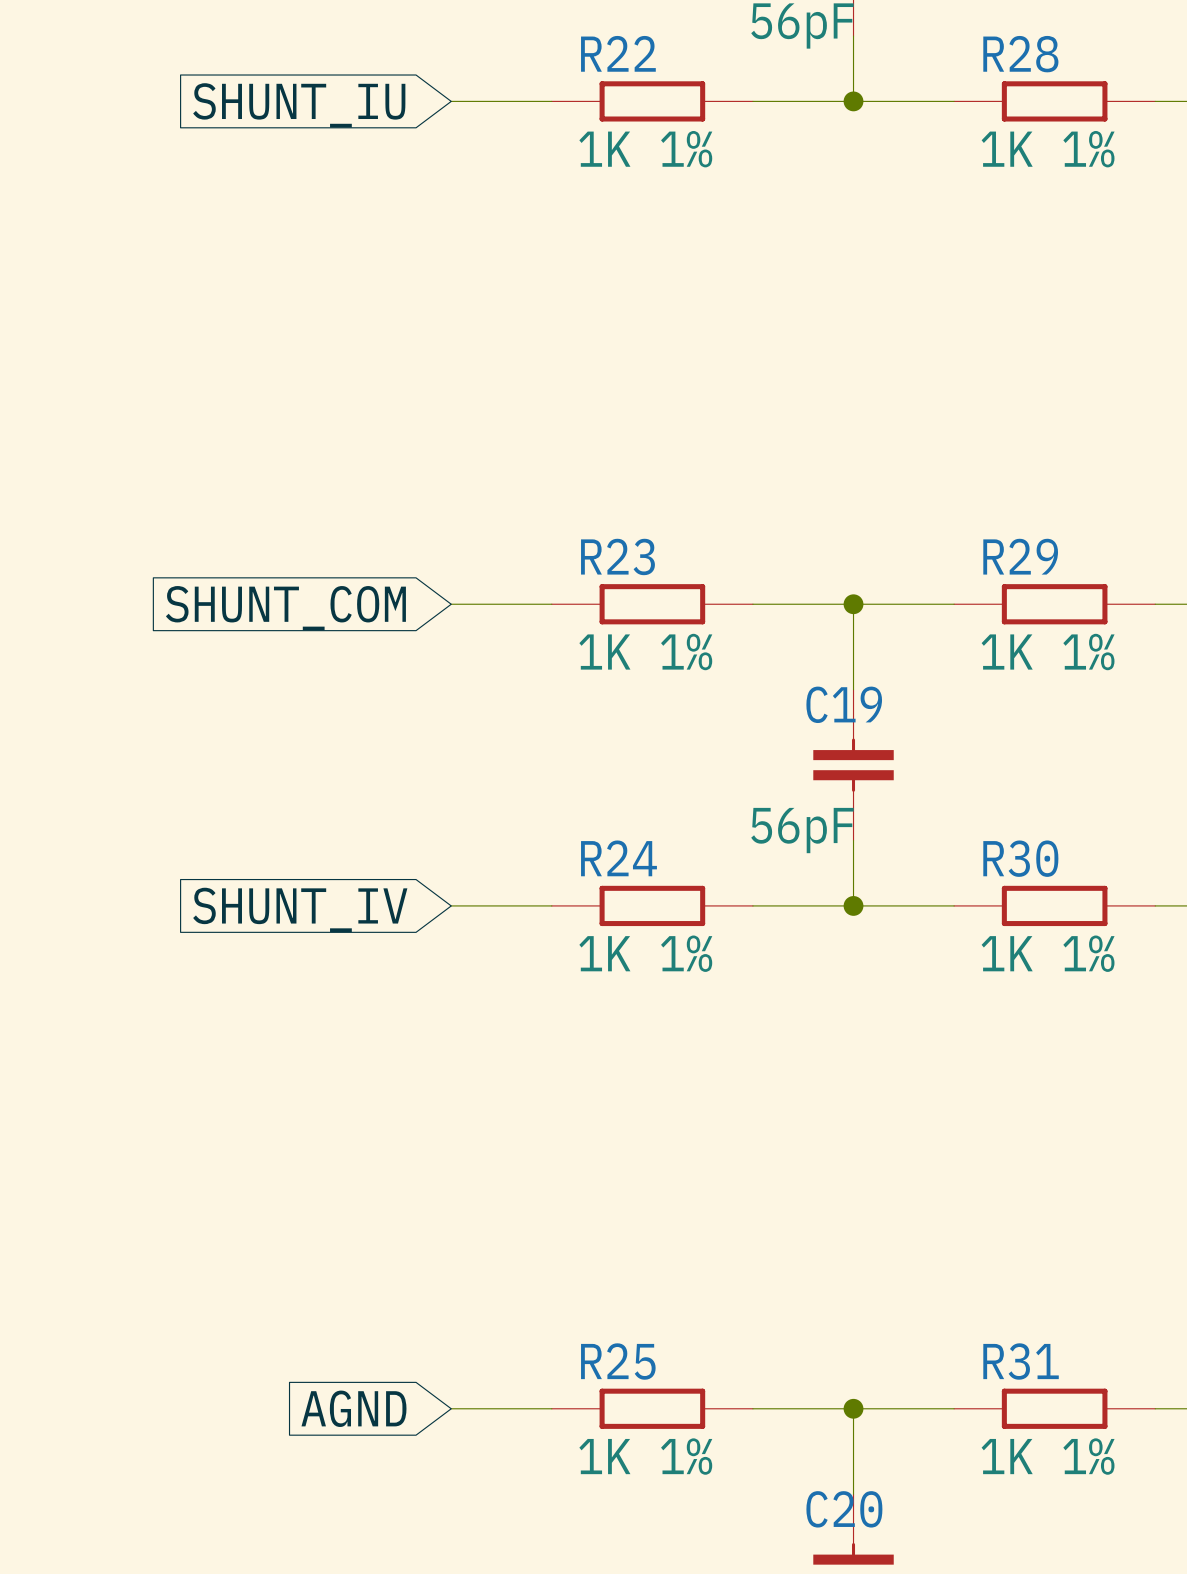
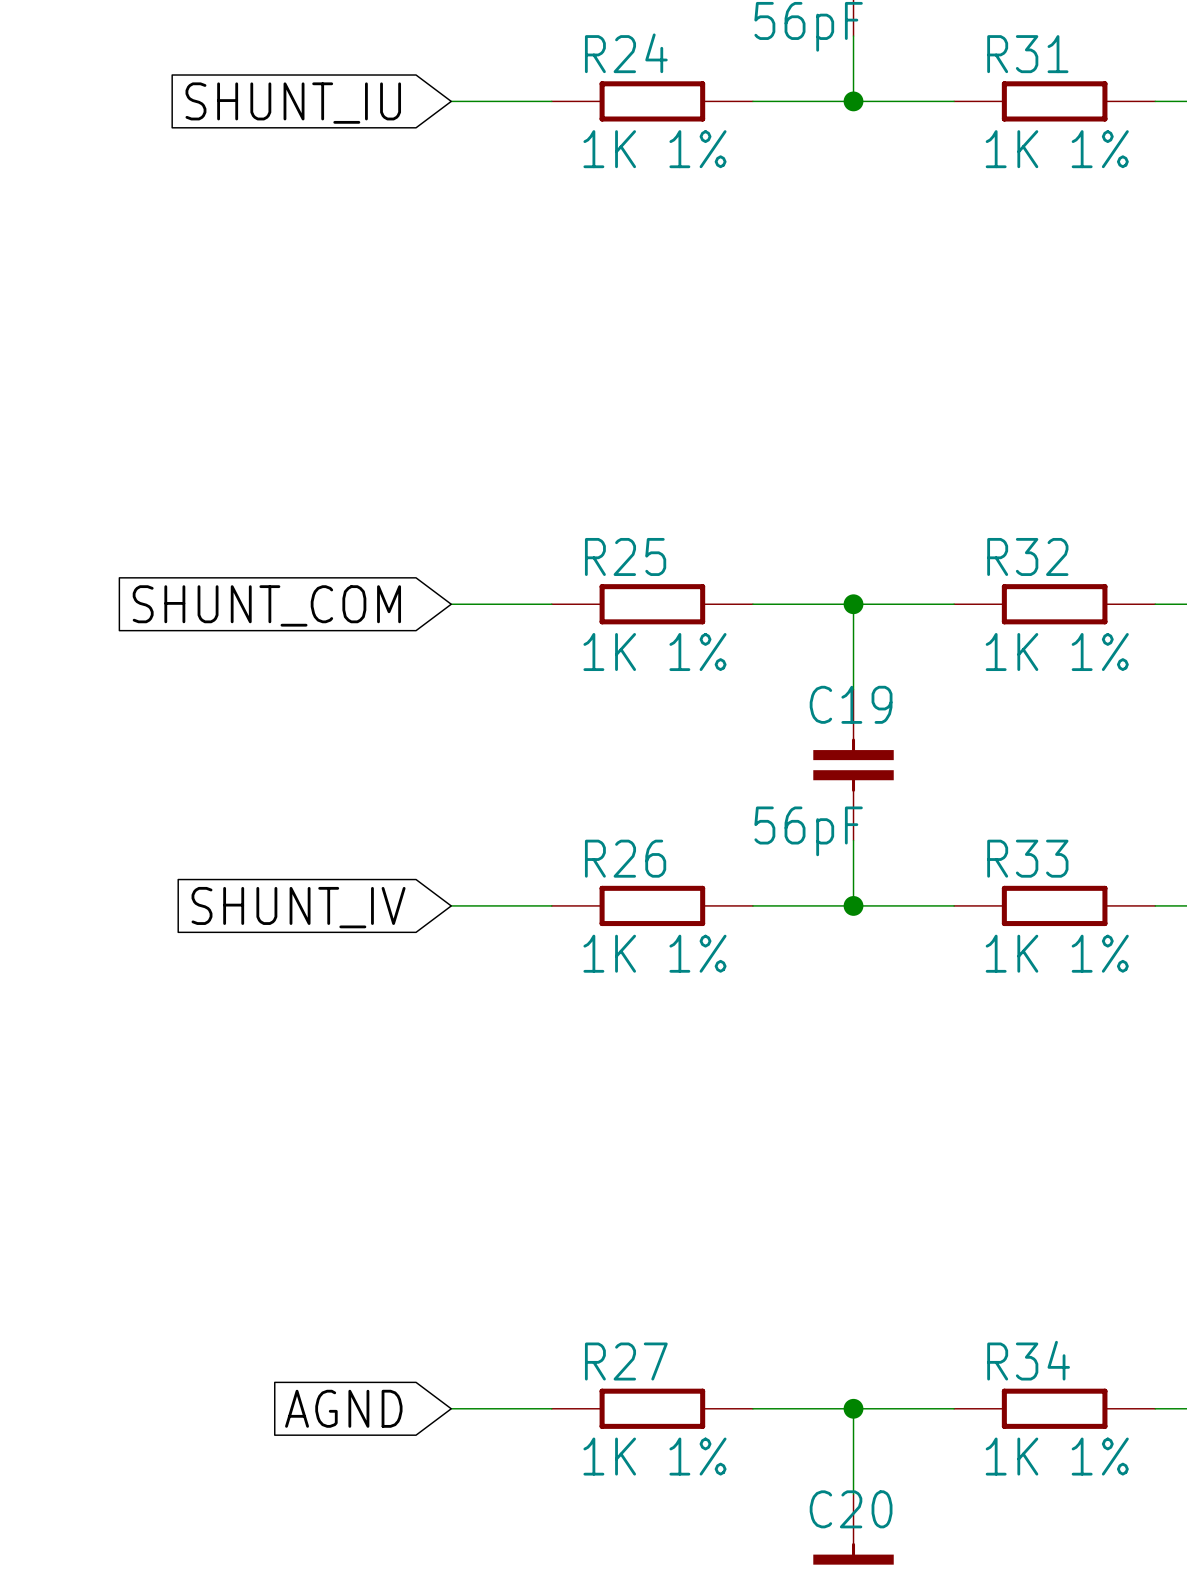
R22 name: R22 (618, 53) -> R24 (626, 53)
R28 name: R28 (1020, 54) -> R31 (1027, 54)
R23 name: R23 (617, 556) -> R25 (625, 556)
R29 name: R29 (1020, 556) -> R32 (1027, 556)
R24 name: R24 (618, 858) -> R26 (625, 858)
R30 name: R30 (1020, 858) -> R33 (1027, 858)
R25 name: R25 (618, 1361) -> R27 (626, 1361)
R31 name: R31 (1021, 1361) -> R34 (1028, 1360)

